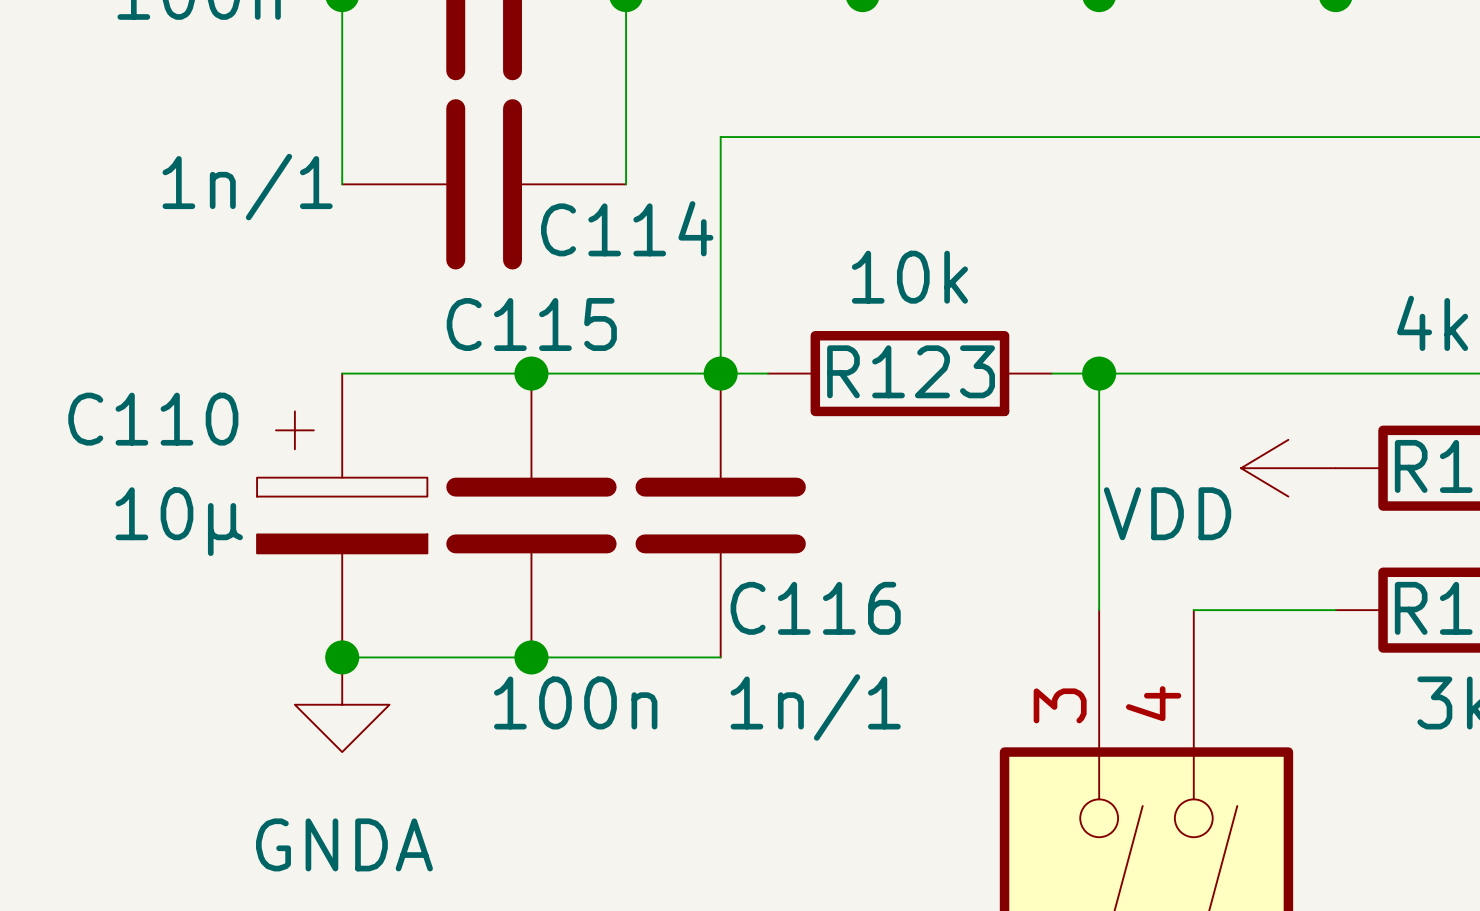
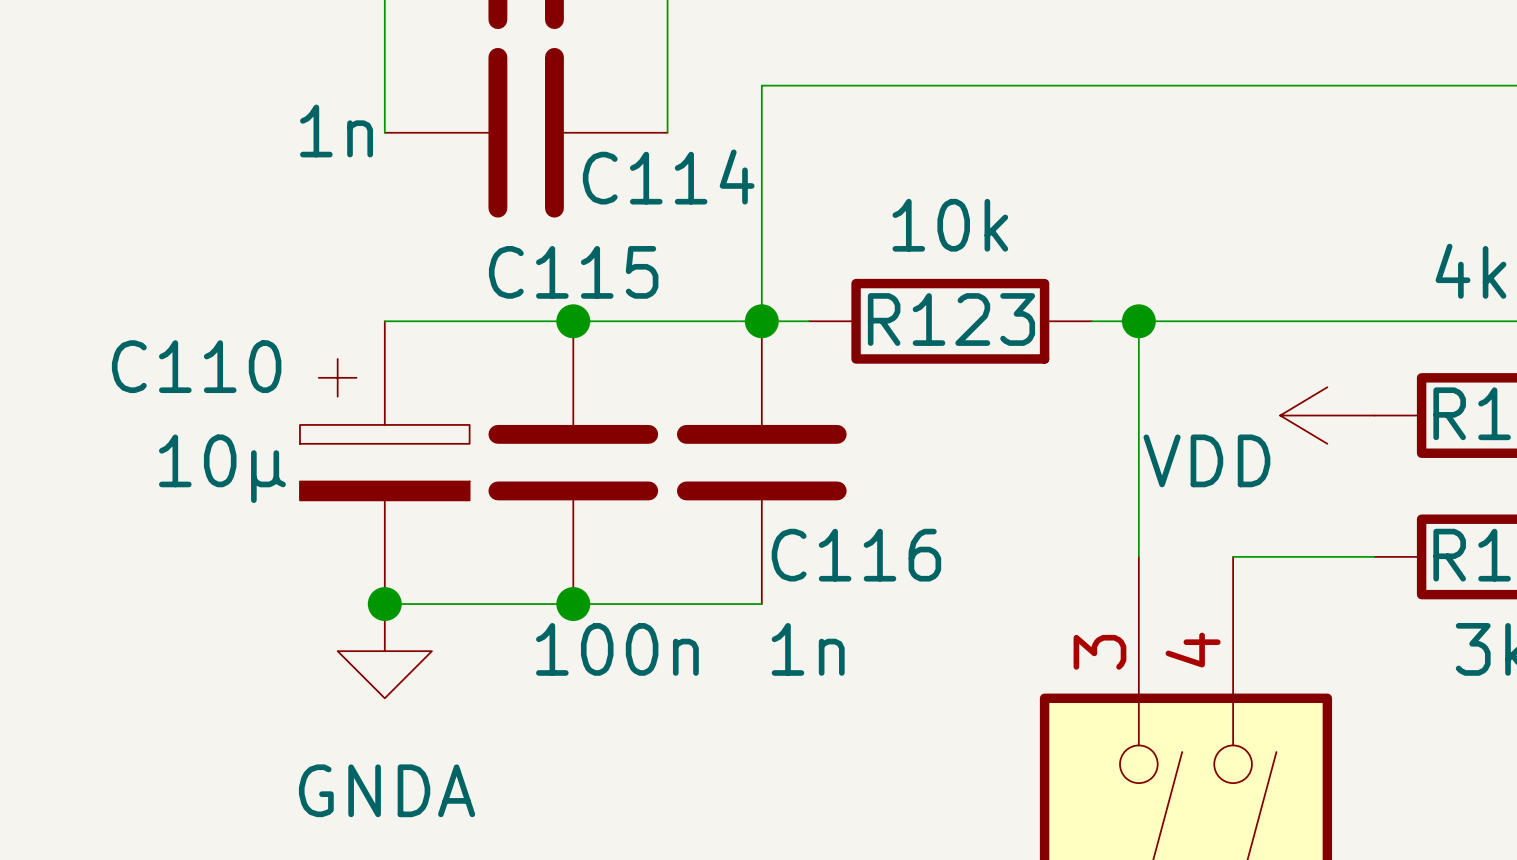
C114 value: 1n/1 (247, 187) -> 1n (336, 131)
C116 value: 1n/1 (815, 707) -> 1n (808, 649)

